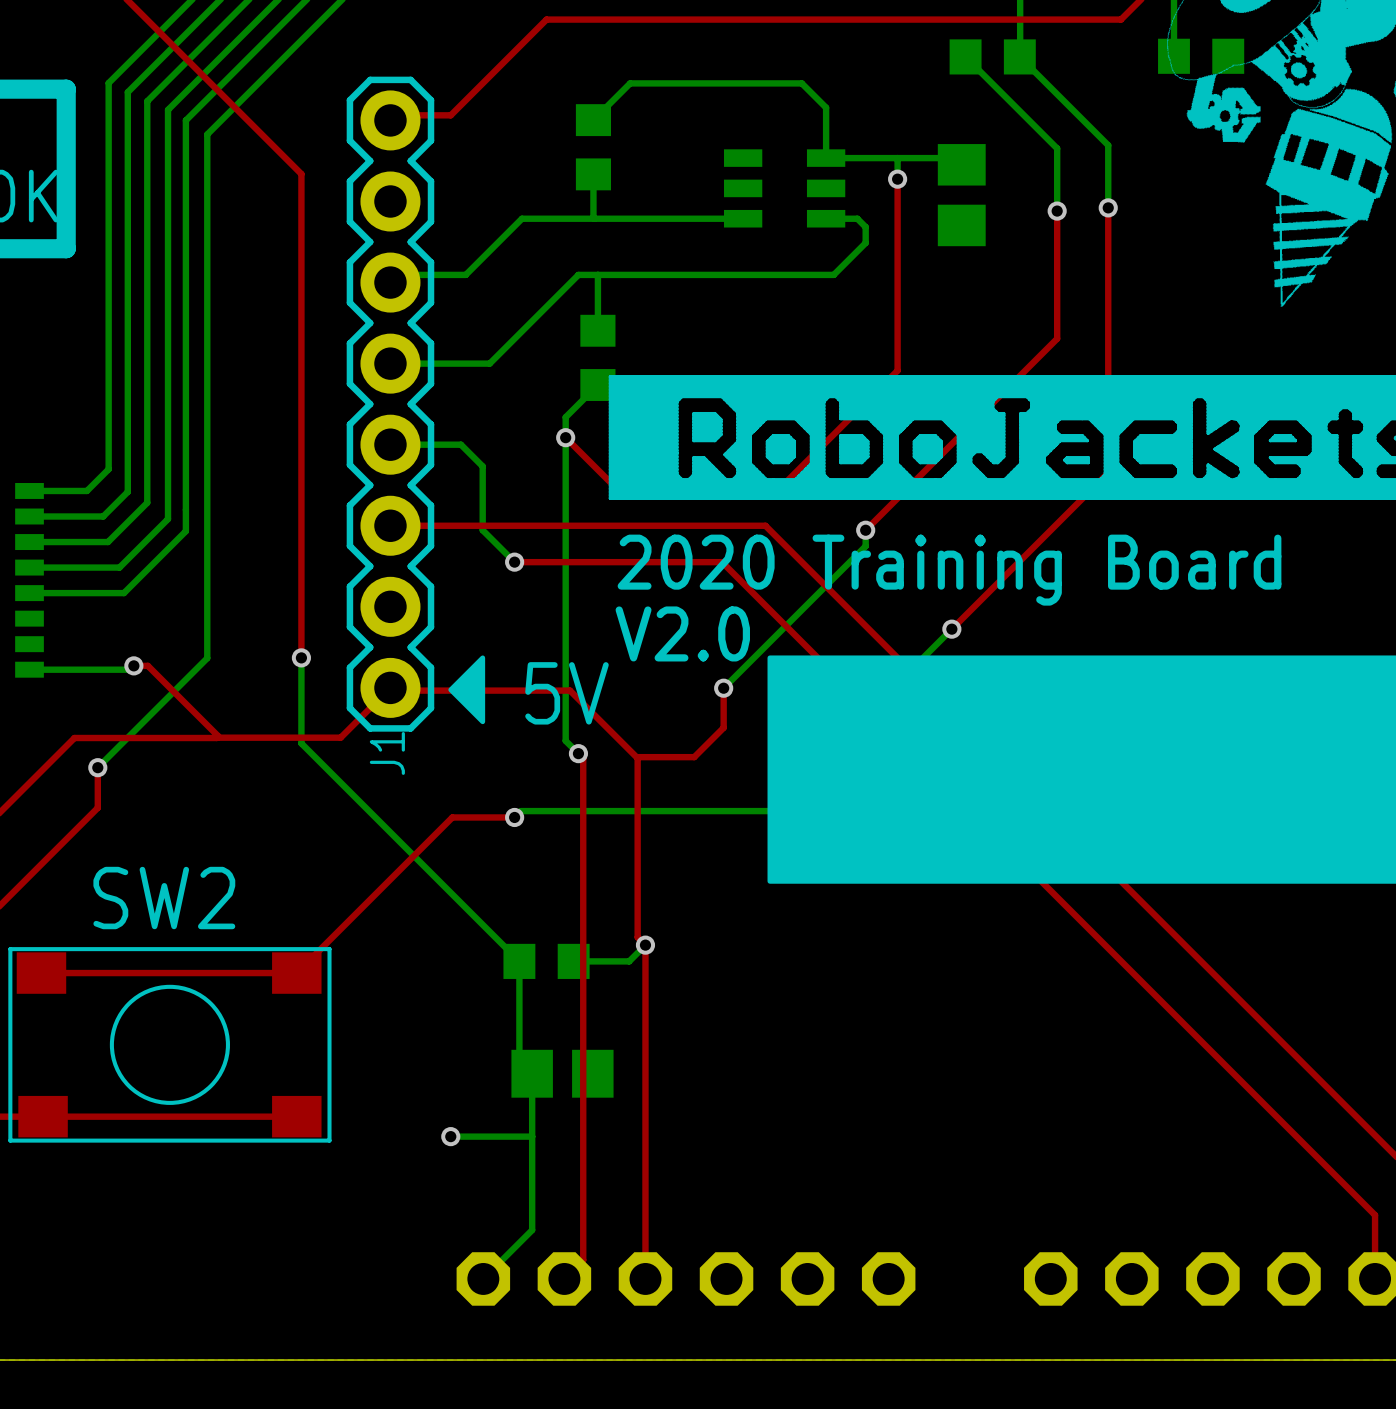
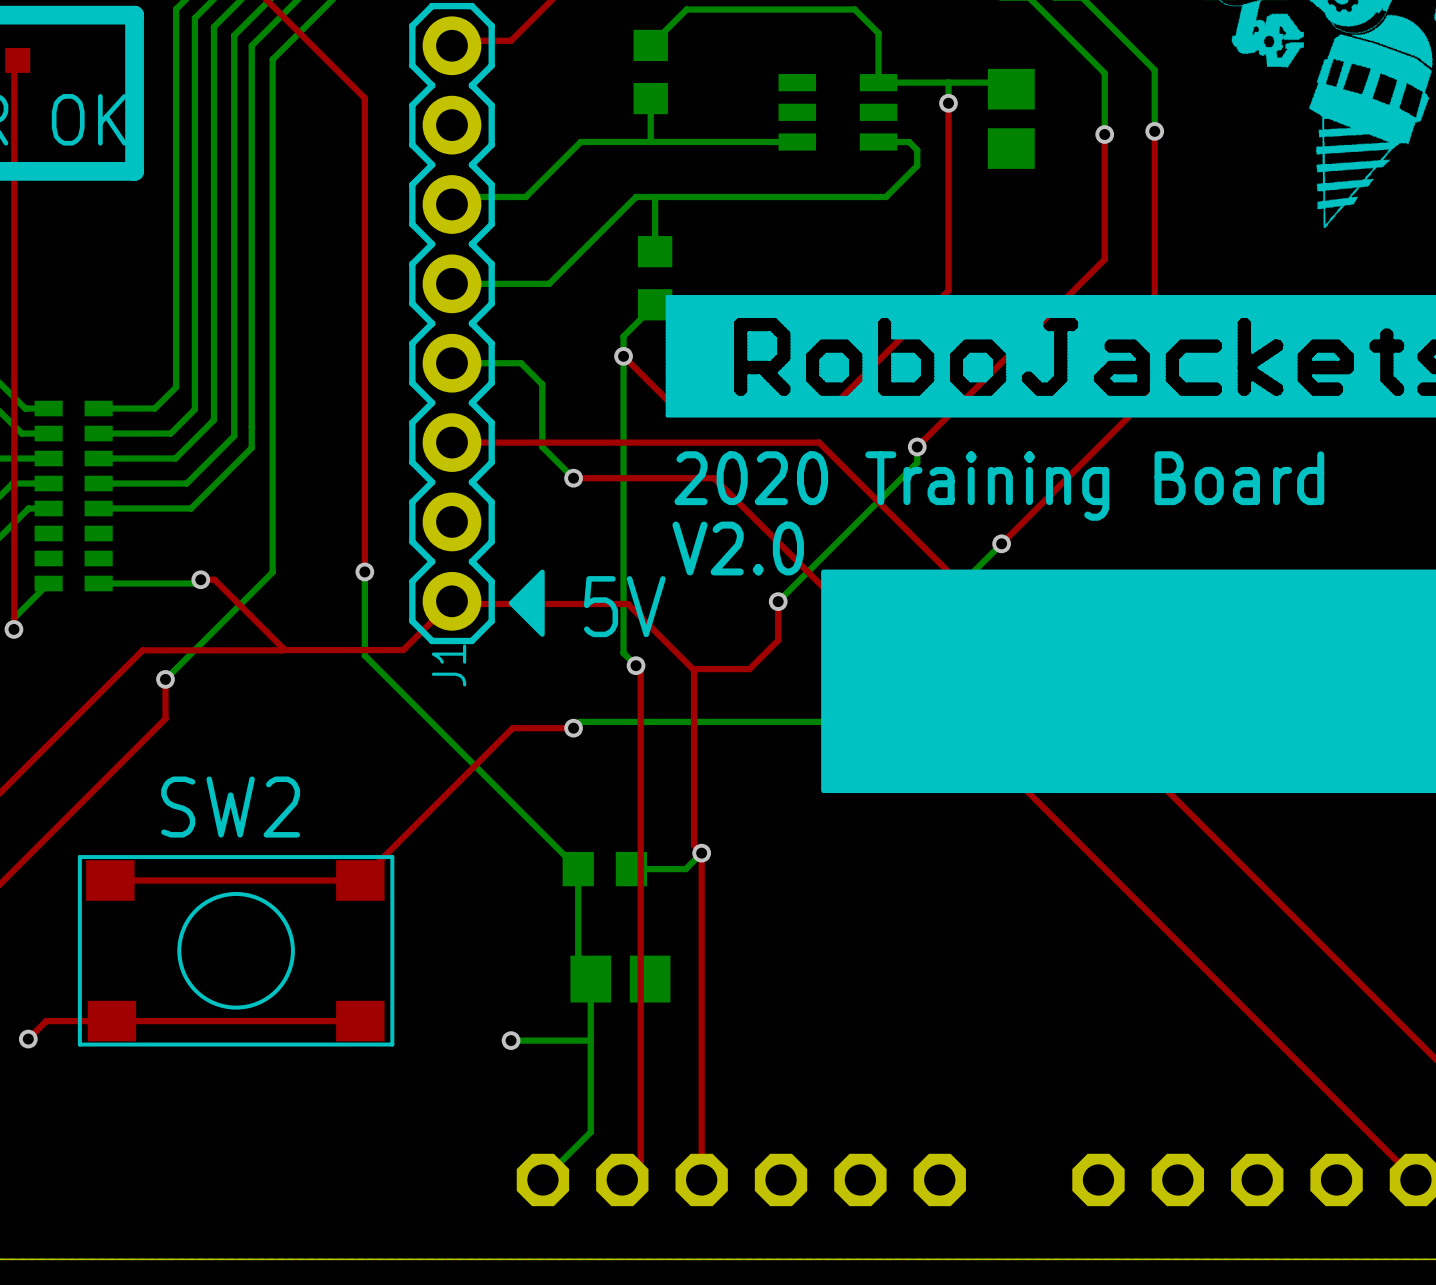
top track: (658, 562) (722, 562) (1375, 1215) (1375, 1278) -> (714, 478) (1415, 1179)

